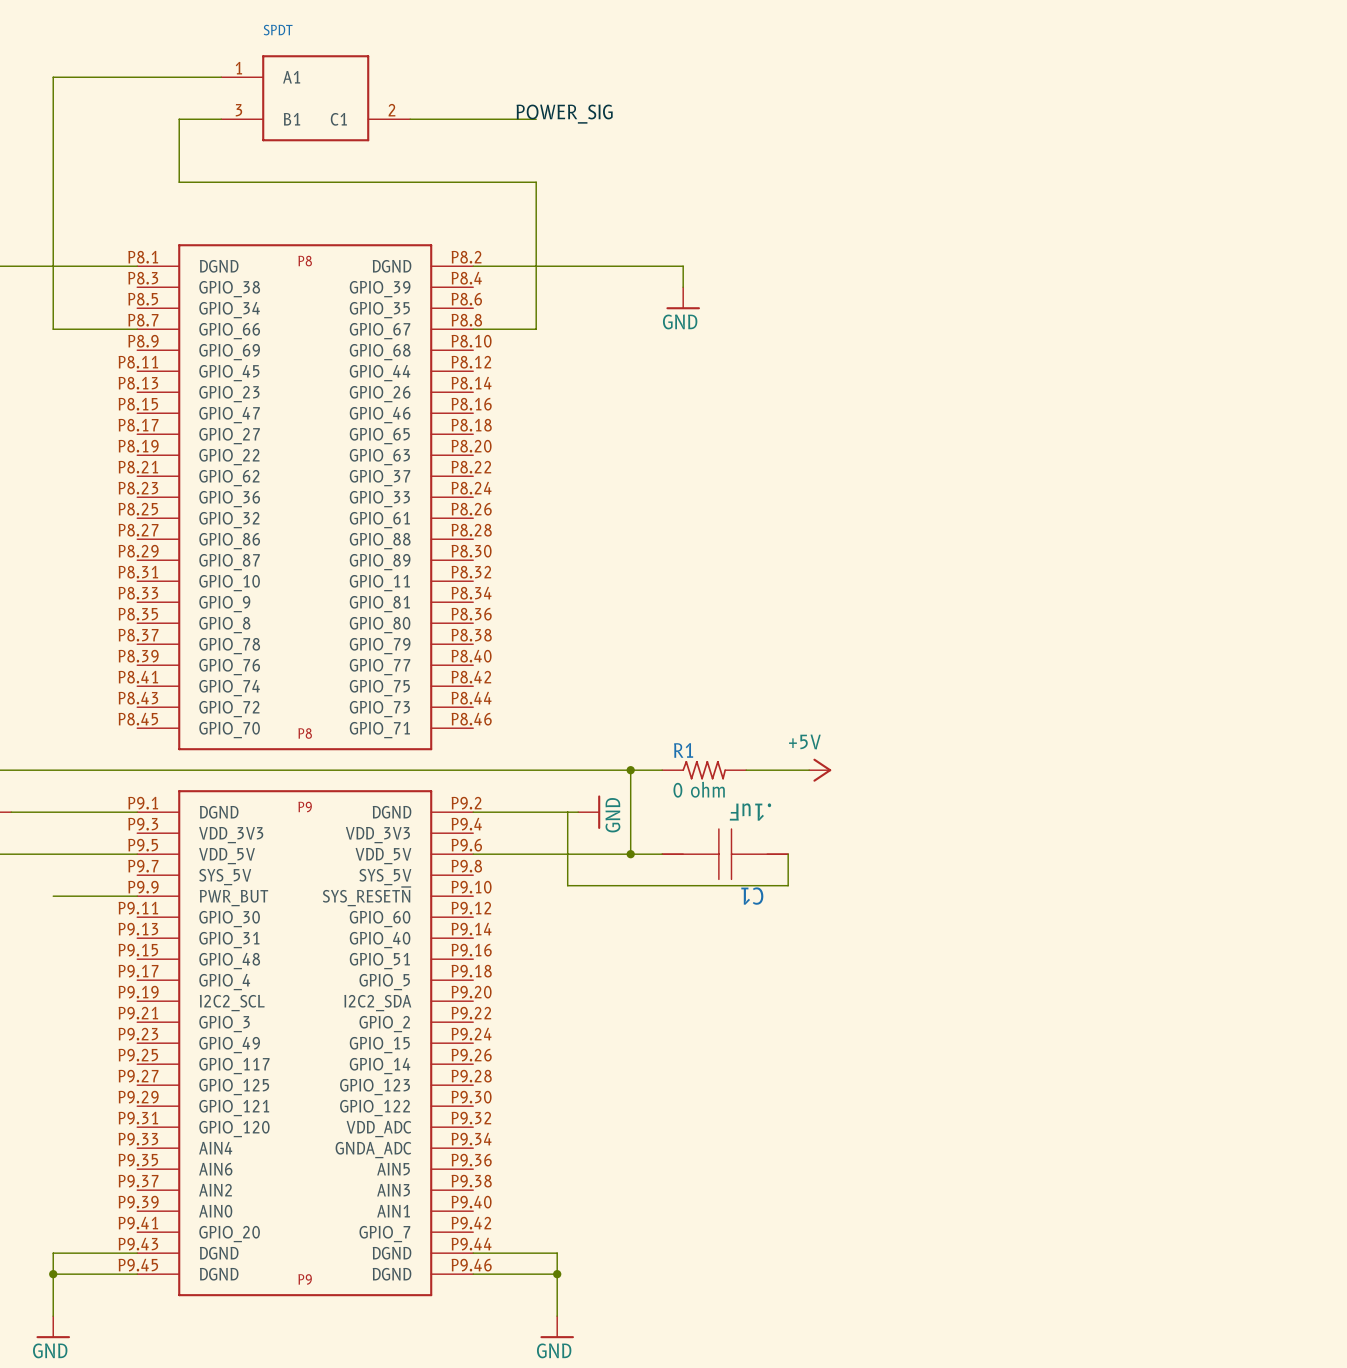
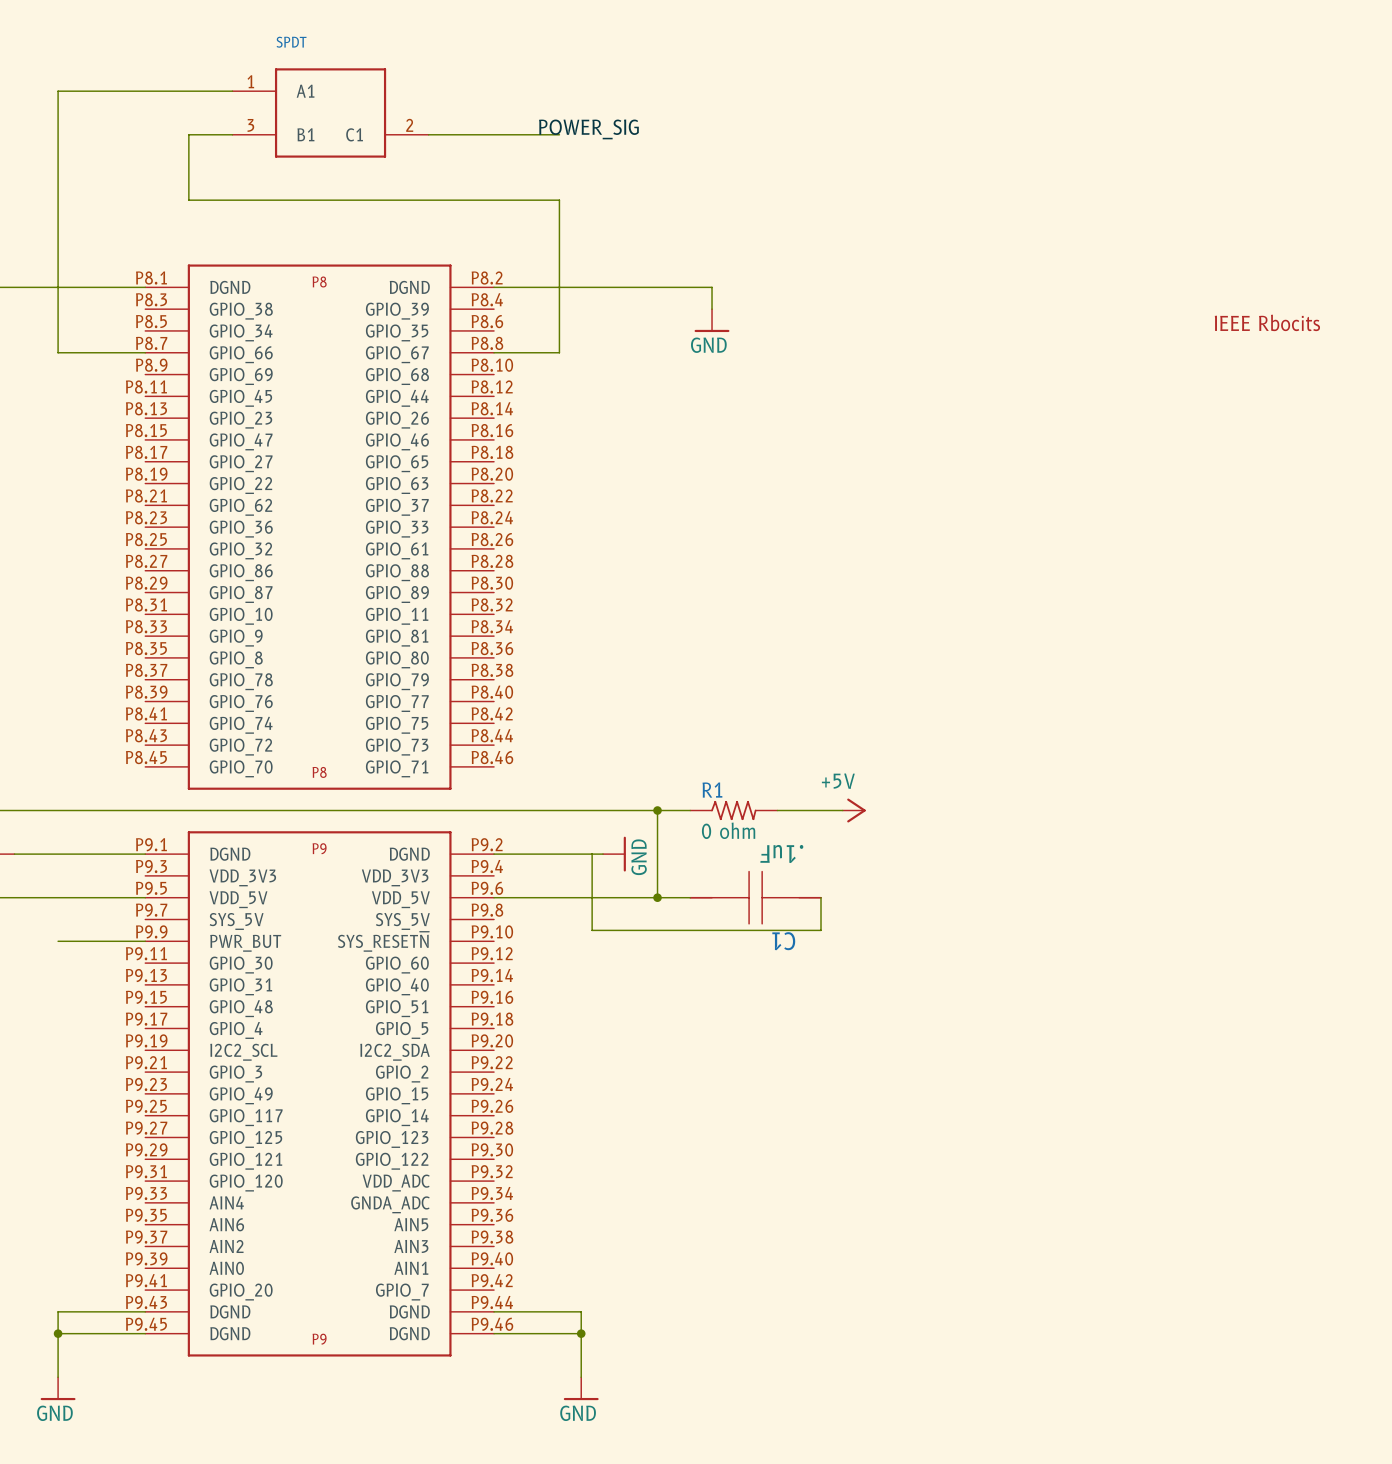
part: none -> (1267, 322)

